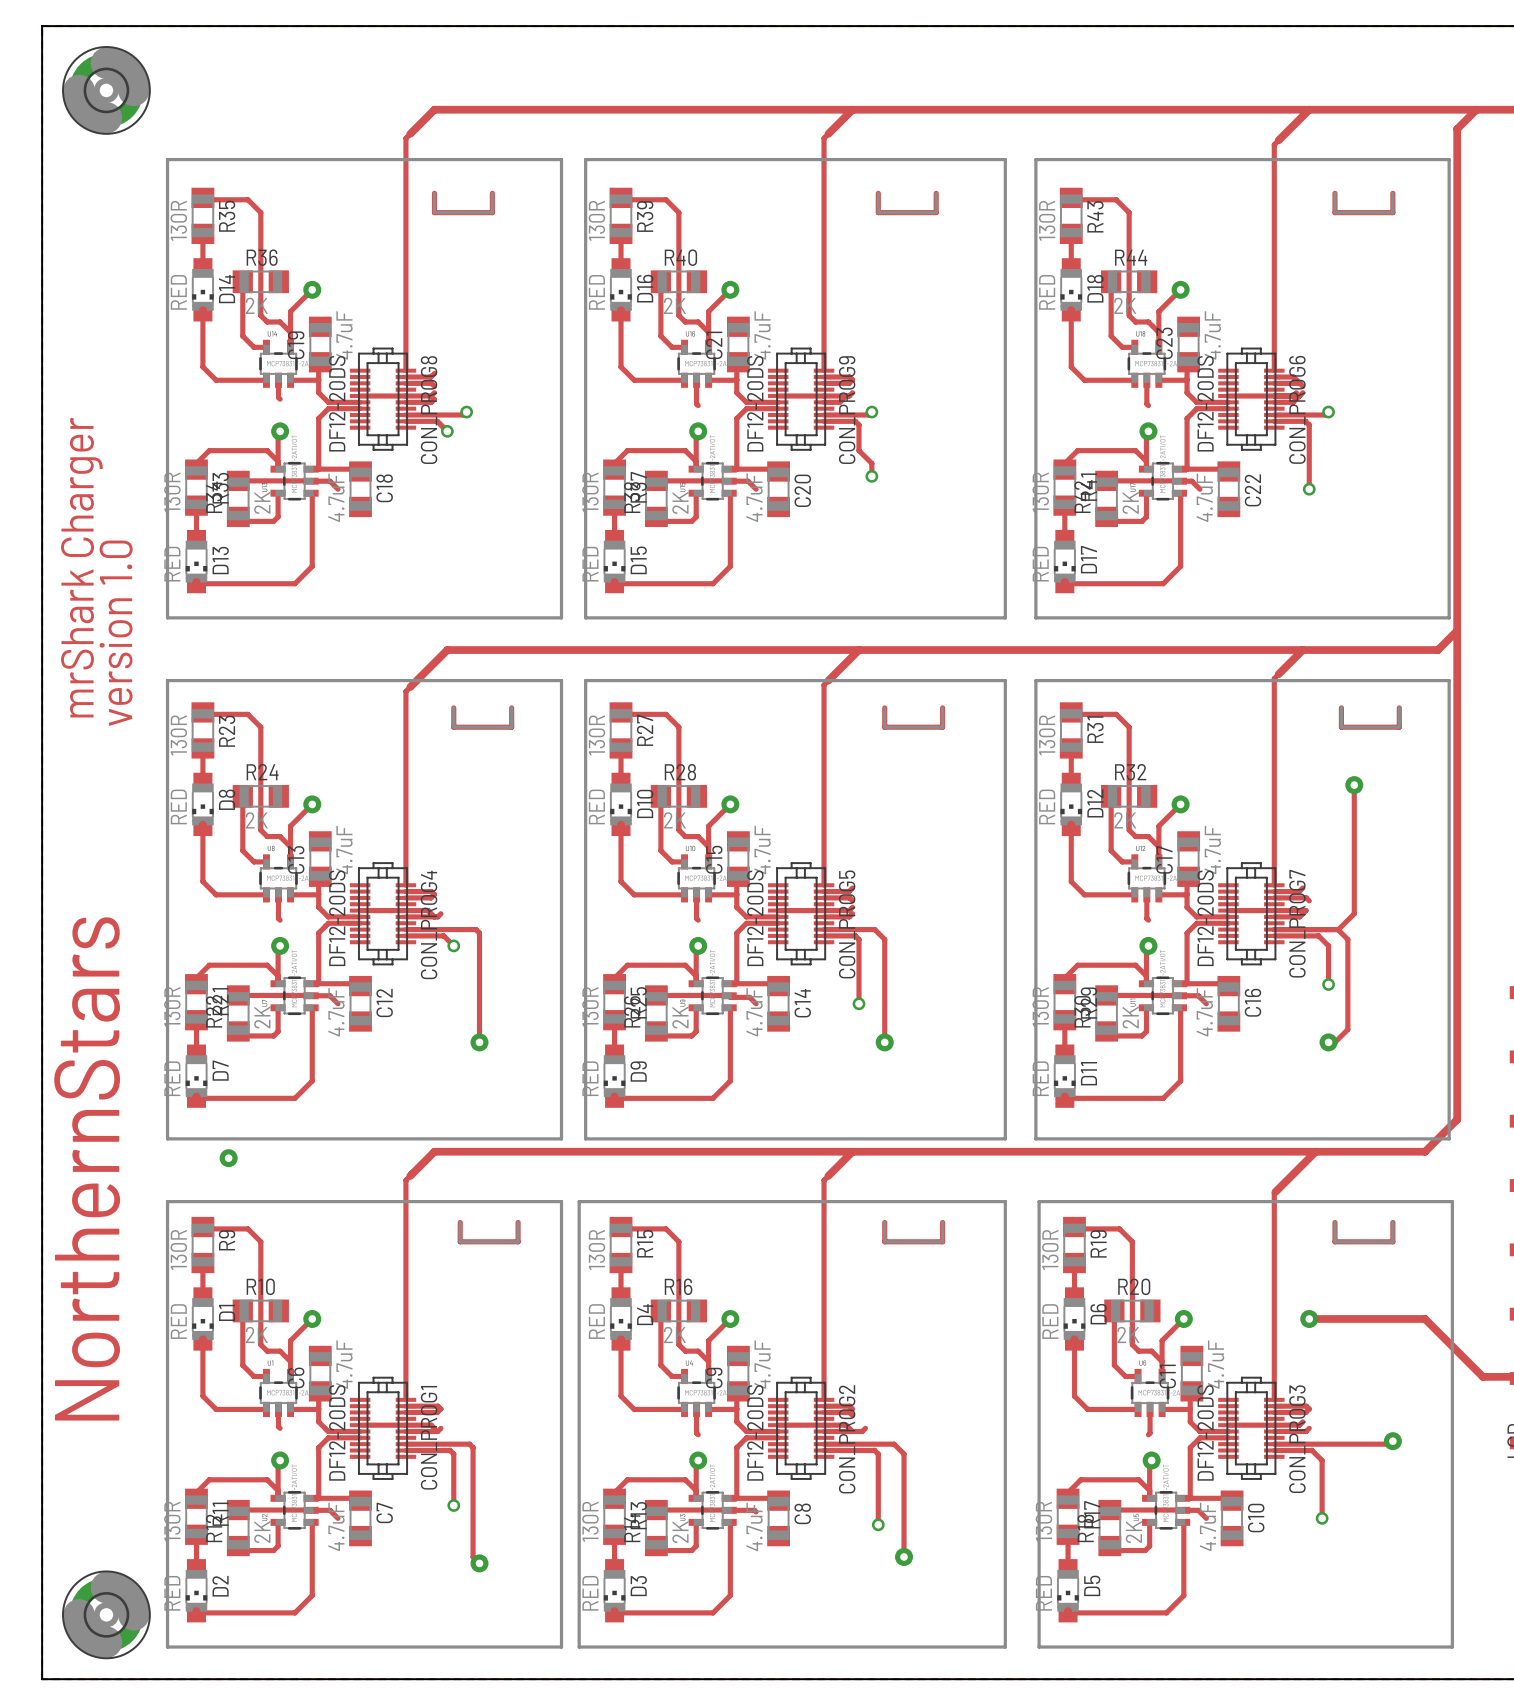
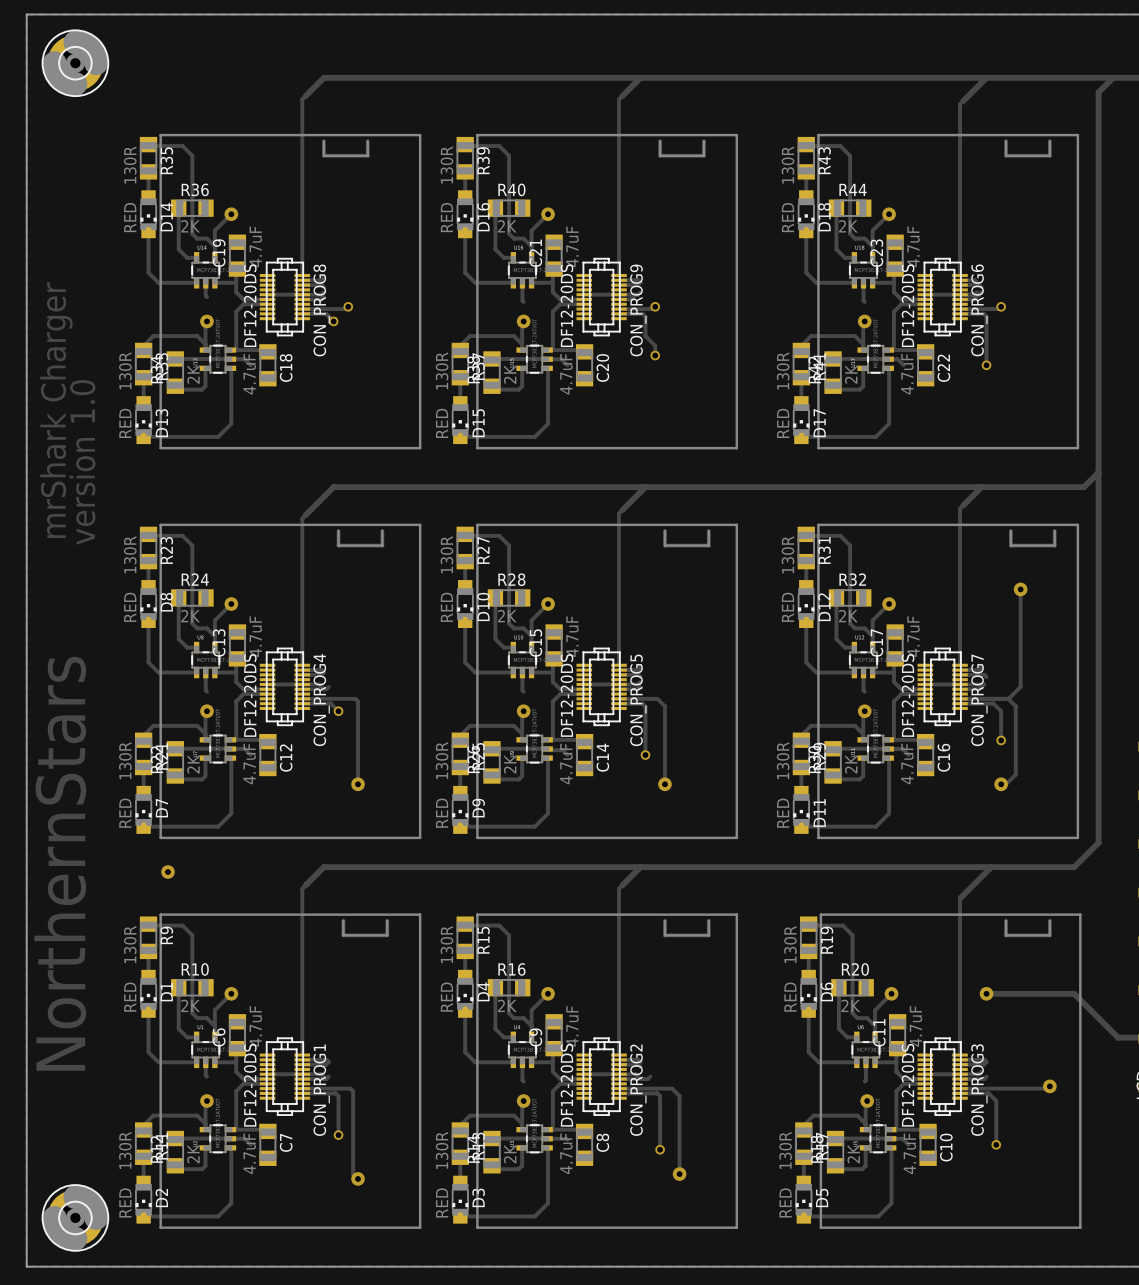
line: (585, 159) (585, 617) (1005, 617) (1005, 159) (585, 159) -> (477, 135) (477, 448) (736, 448) (736, 135) (477, 135)
line: (1035, 159) (1035, 617) (1449, 617) (1449, 159) (1035, 159) -> (818, 135) (818, 448) (1077, 448) (1077, 135) (818, 135)
line: (561, 185) (561, 159) (167, 159) (167, 617) (561, 617) (561, 598) -> (420, 135) (160, 135) (160, 448) (420, 448)
line: (585, 680) (1005, 680) (1005, 1138) (585, 1138) (585, 680) -> (477, 524) (477, 837) (736, 837) (736, 524) (477, 524)
line: (1035, 680) (1449, 680) (1449, 1138) (1035, 1138) (1035, 680) -> (818, 524) (818, 837) (1077, 837) (1077, 524) (818, 524)
line: (561, 699) (561, 680) (167, 680) (167, 1138) (561, 1138) (561, 1113) -> (420, 524) (160, 524) (160, 837) (420, 837)
line: (579, 1201) (1005, 1201) (1005, 1647) (579, 1647) (579, 1201) -> (477, 914) (477, 1227) (736, 1227) (736, 914) (477, 914)
line: (1039, 1201) (1452, 1201) (1452, 1647) (1039, 1647) (1039, 1201) -> (820, 914) (820, 1227) (1080, 1227) (1080, 914) (820, 914)
line: (561, 1214) (561, 1201) (167, 1201) (167, 1647) (561, 1647) (561, 1627) -> (420, 914) (160, 914) (160, 1227) (420, 1227)

